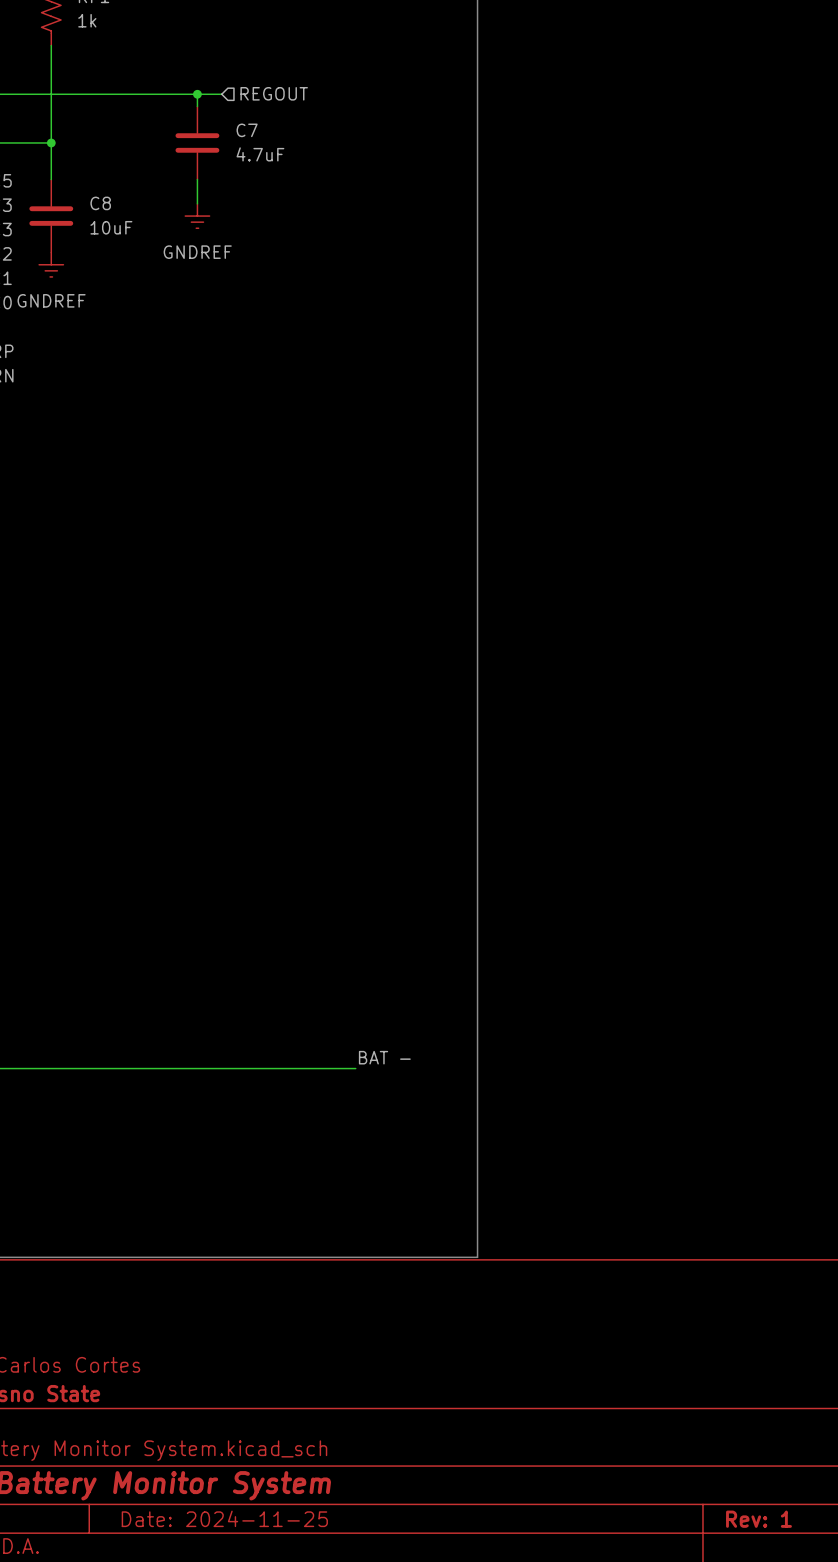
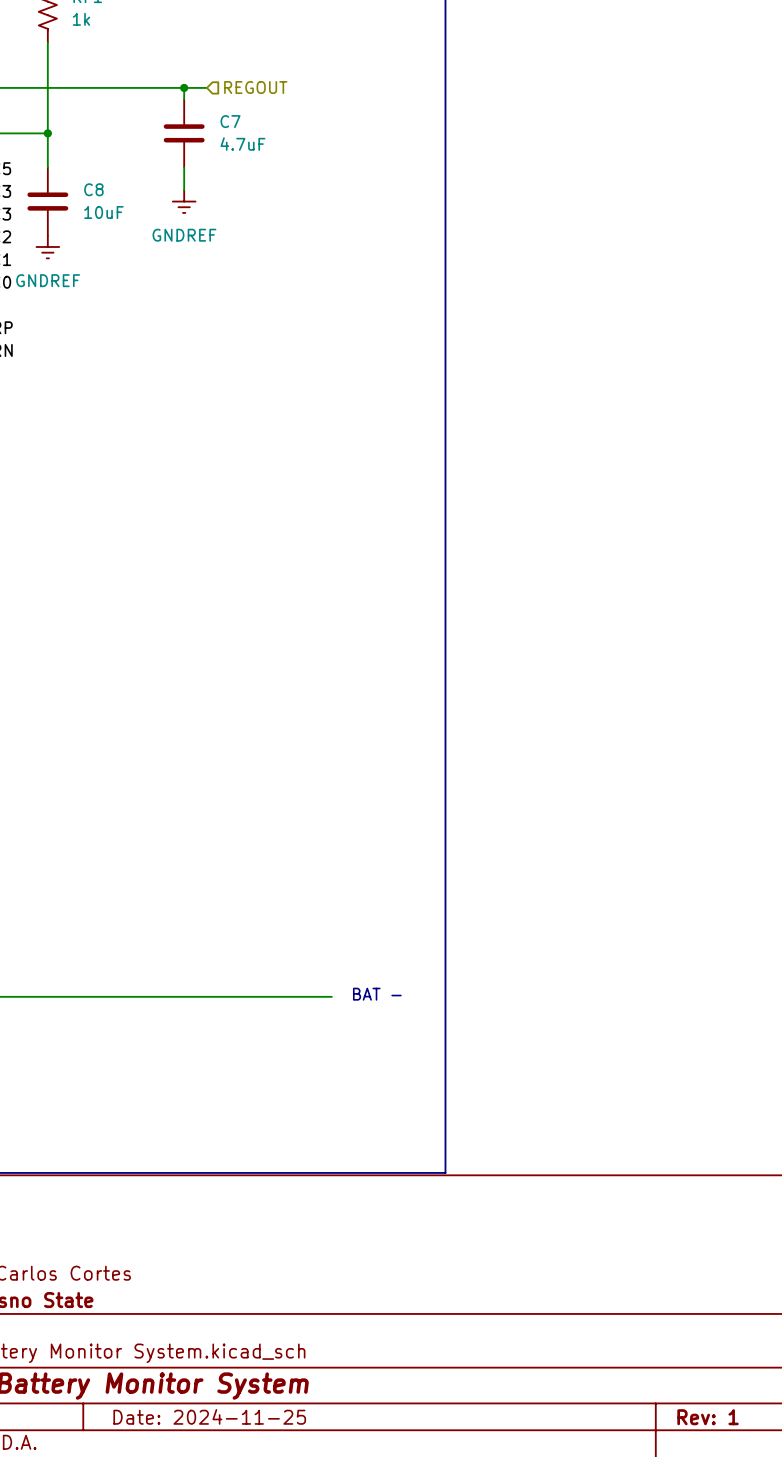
label: BAT - (384, 1057) -> none
text: none -> BAT - (377, 994)

